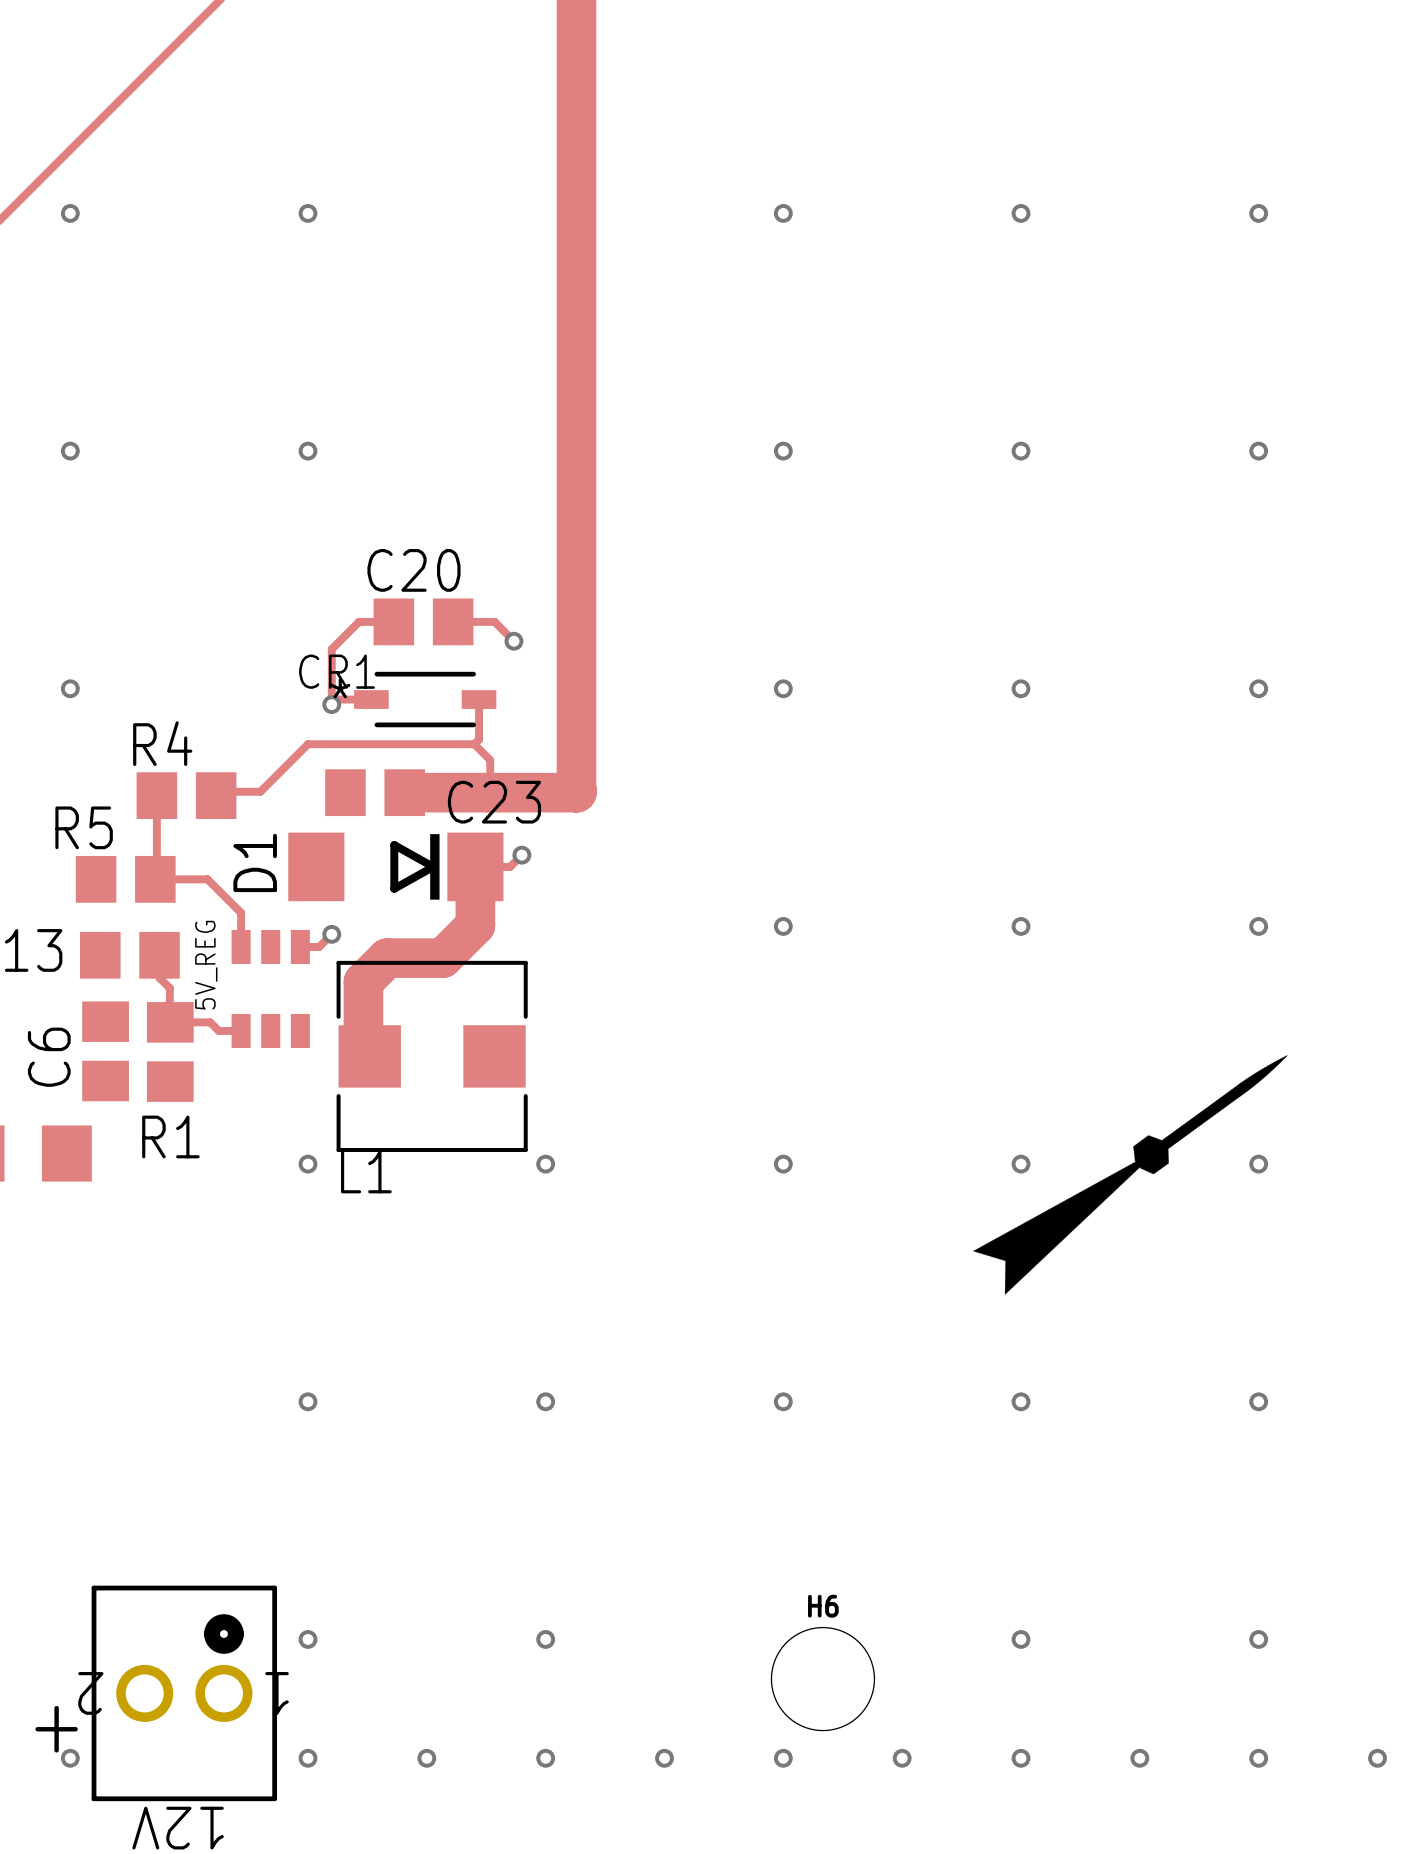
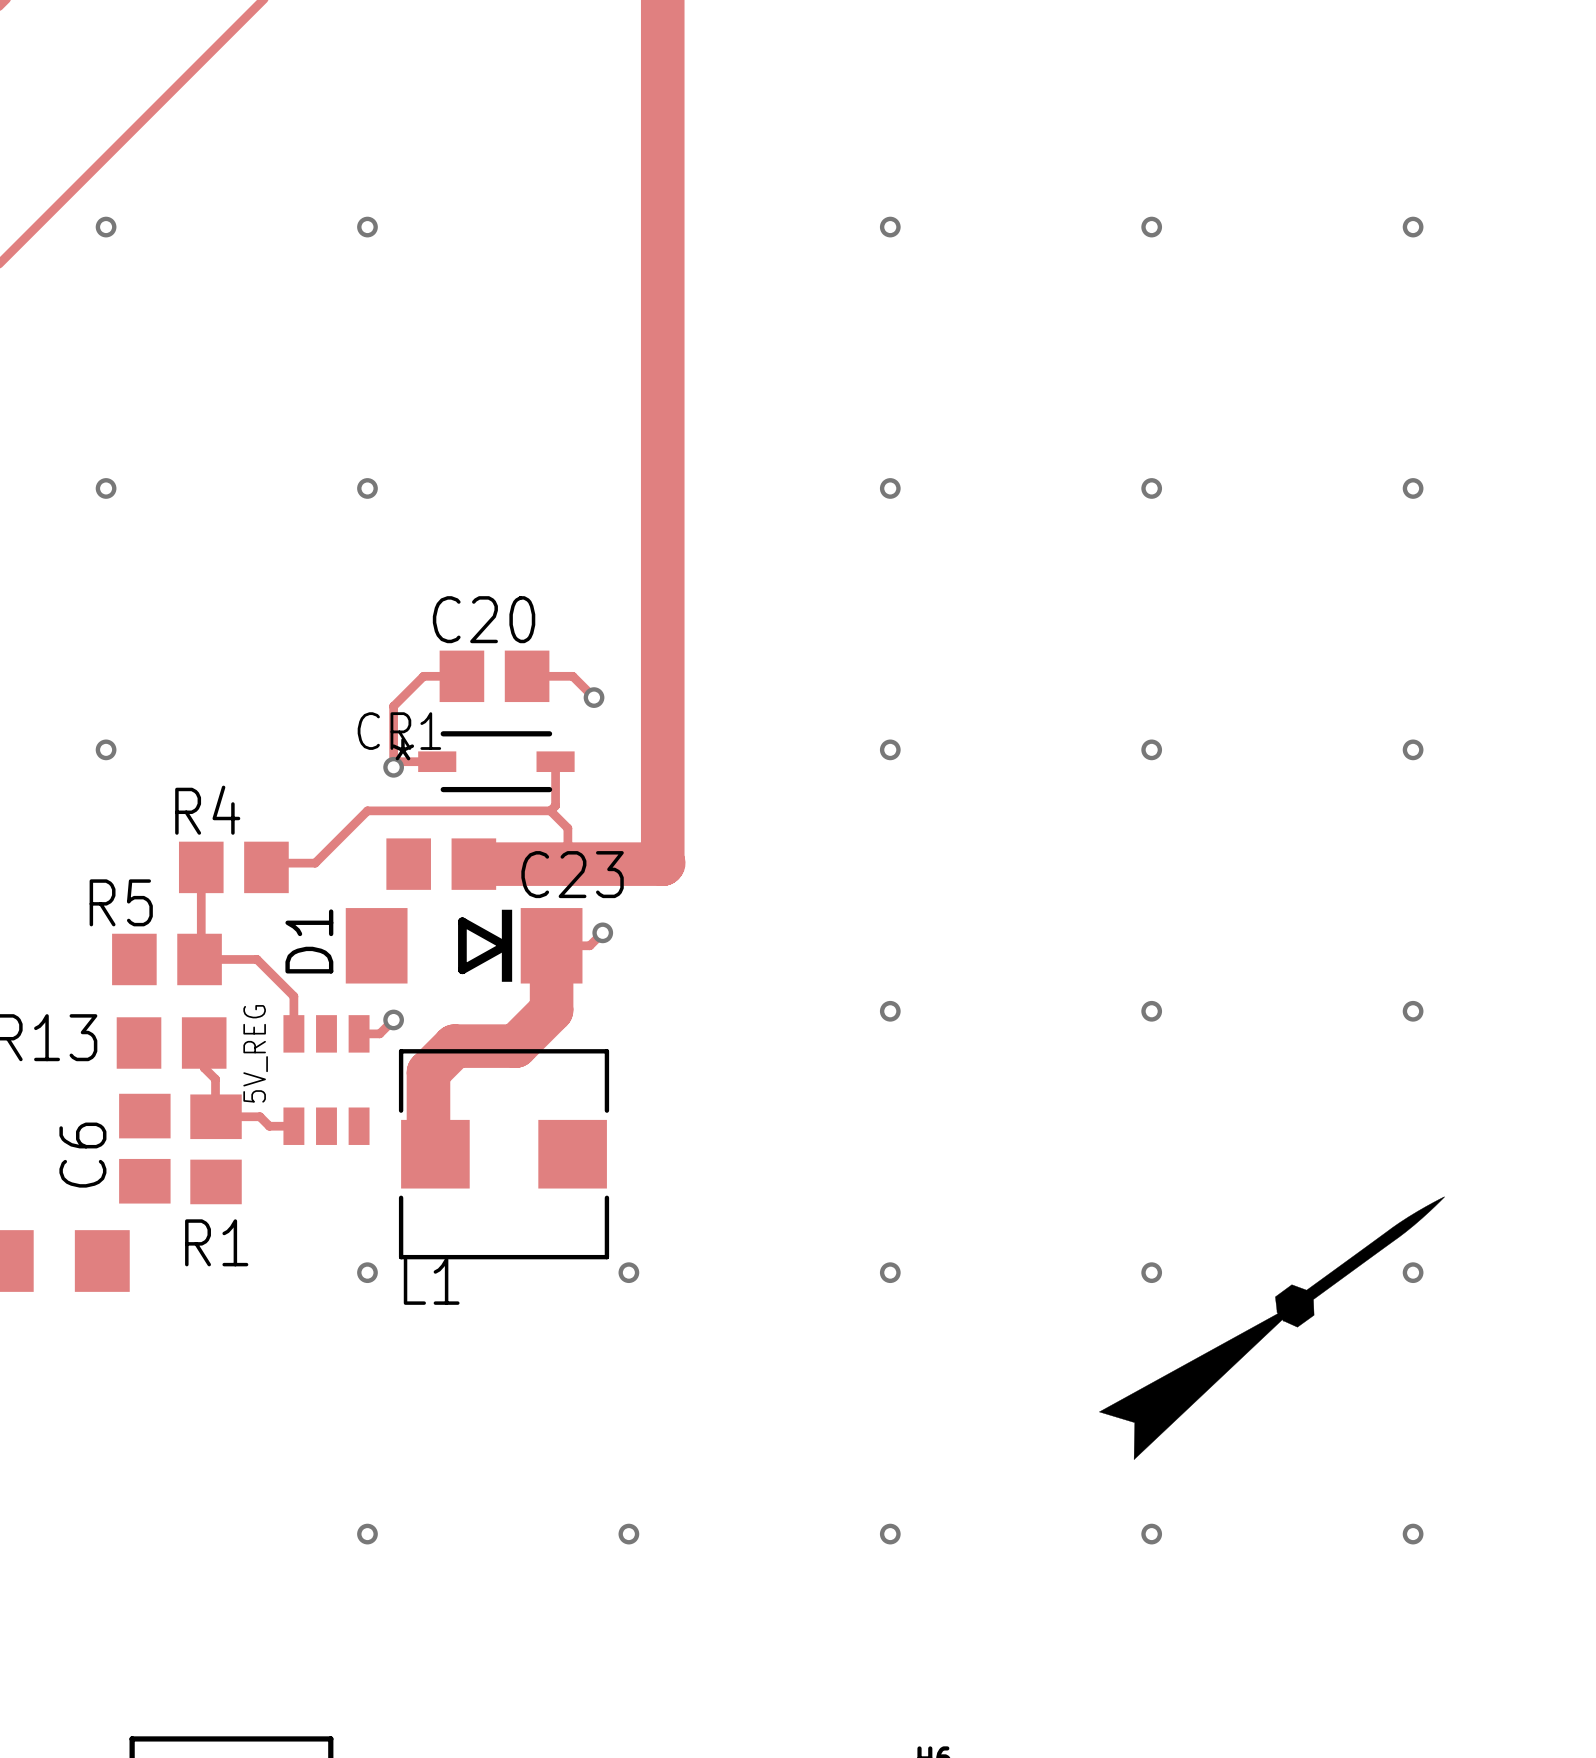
drawing position: (1130, 1175) -> (1271, 1328)

